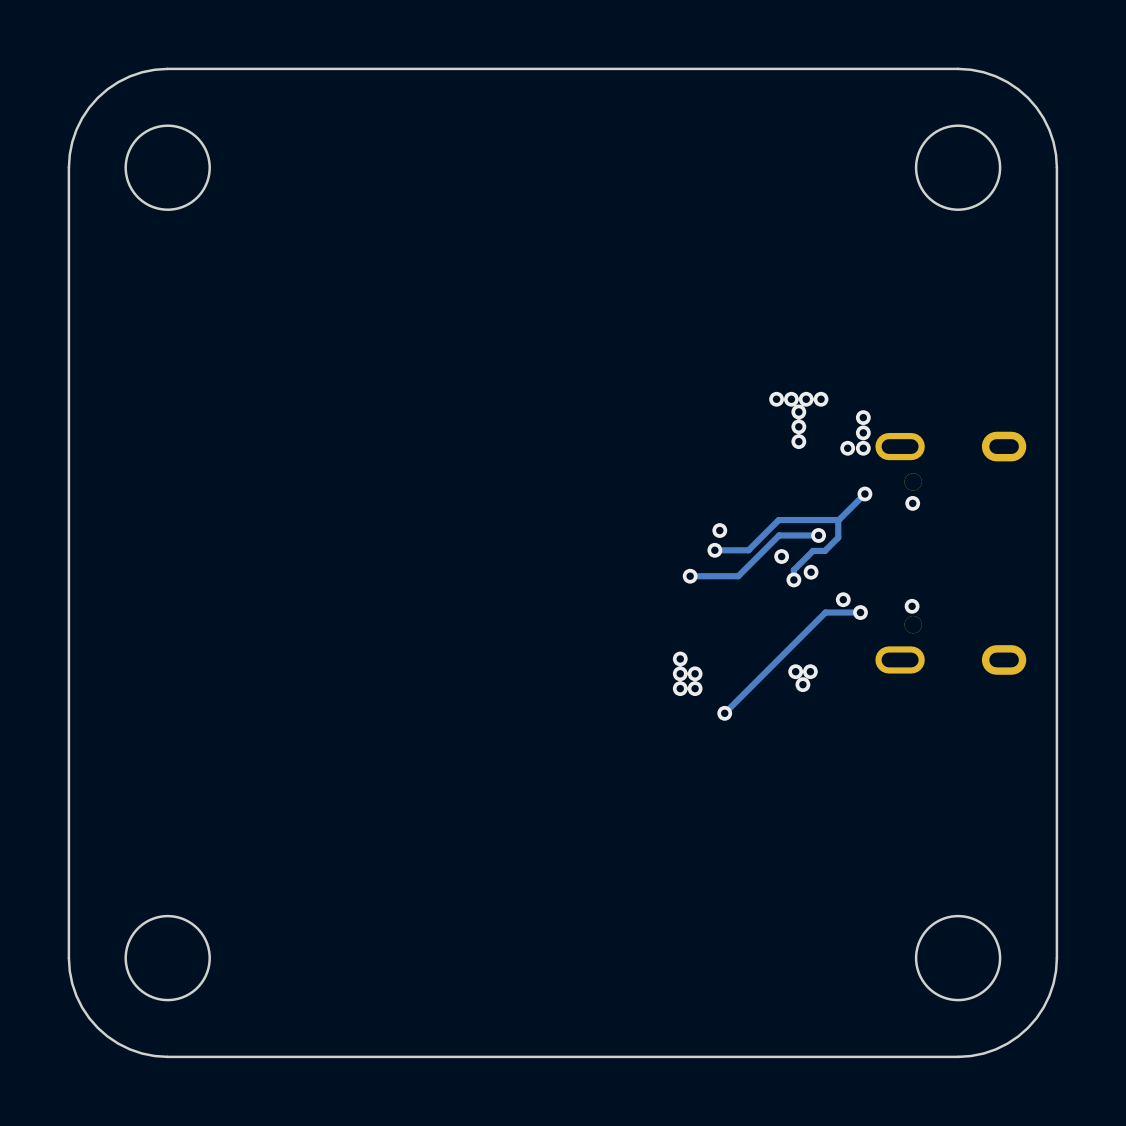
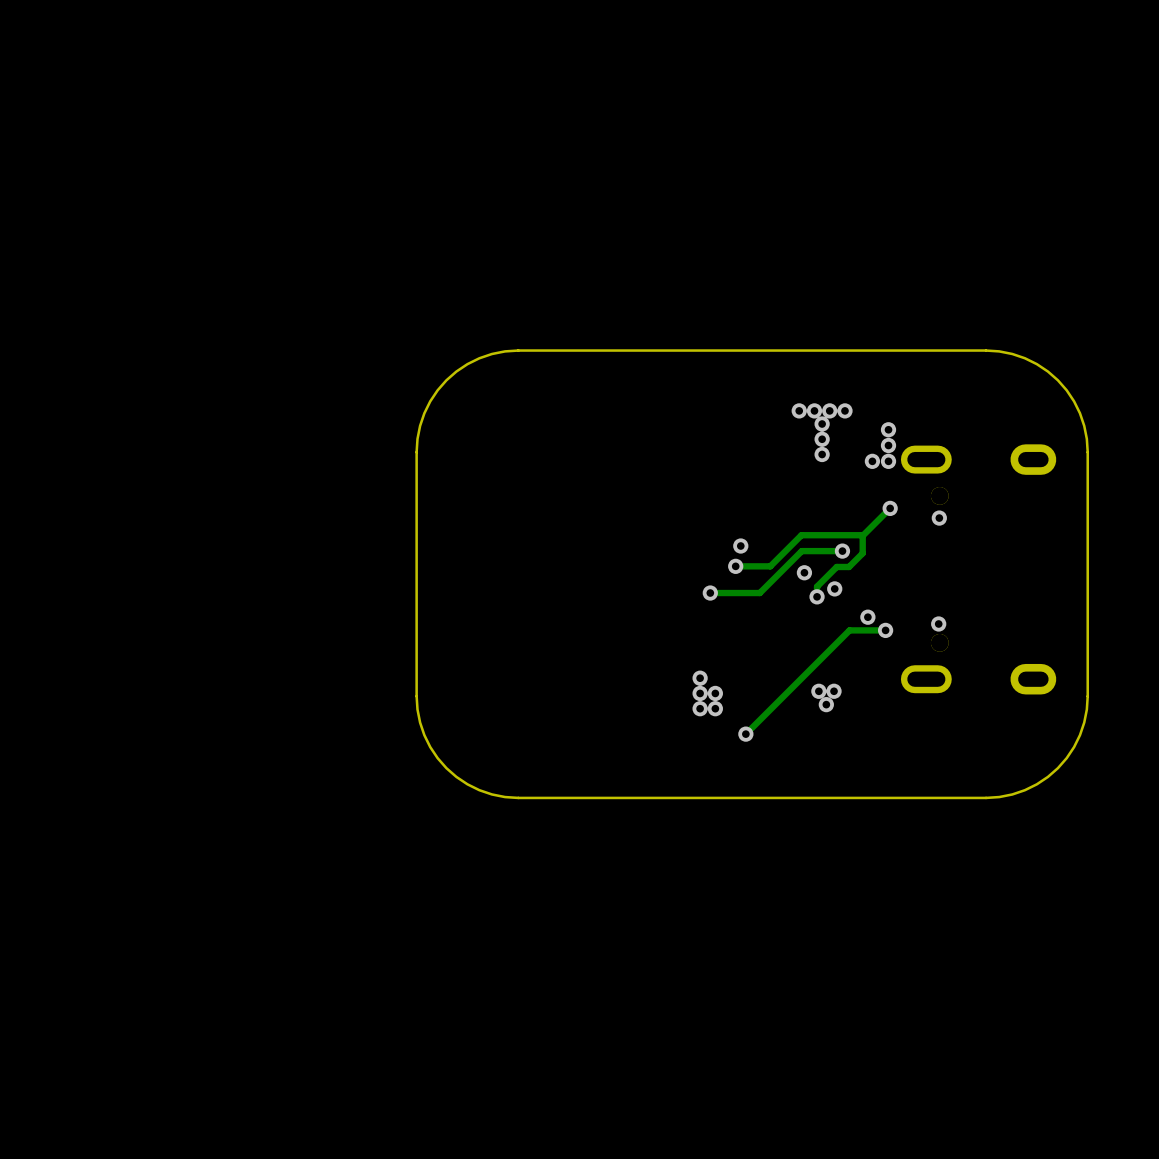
round board edge: [124, 124, 211, 211] -> none
round board edge: [914, 124, 1002, 211] -> none
board edge: (1056, 439) (1056, 154) (1049, 129) (1036, 107) (1018, 89) (995, 76) (970, 69) (958, 68) (167, 68) (142, 72) (118, 82) (97, 97) (82, 118) (72, 142) (68, 167) (68, 958) (72, 983) (82, 1007) (89, 1018) (107, 1036) (129, 1049) (154, 1056) (958, 1056) (983, 1053) (1007, 1043) (1027, 1027) (1036, 1018) (1049, 995) (1056, 970) (1056, 676) -> (1087, 452) (1086, 438) (1079, 413) (1066, 390) (1057, 380) (1047, 371) (1024, 358) (1012, 354) (986, 350) (505, 351) (479, 358) (467, 364) (446, 380) (437, 390) (424, 413) (420, 425) (416, 452) (417, 709) (424, 735) (437, 758) (456, 776) (479, 790) (505, 797) (518, 797) (999, 797) (1024, 790) (1047, 776) (1057, 768) (1074, 747) (1079, 735) (1084, 722) (1087, 696)
round board edge: [124, 914, 211, 1002] -> none
round board edge: [914, 914, 1002, 1002] -> none

